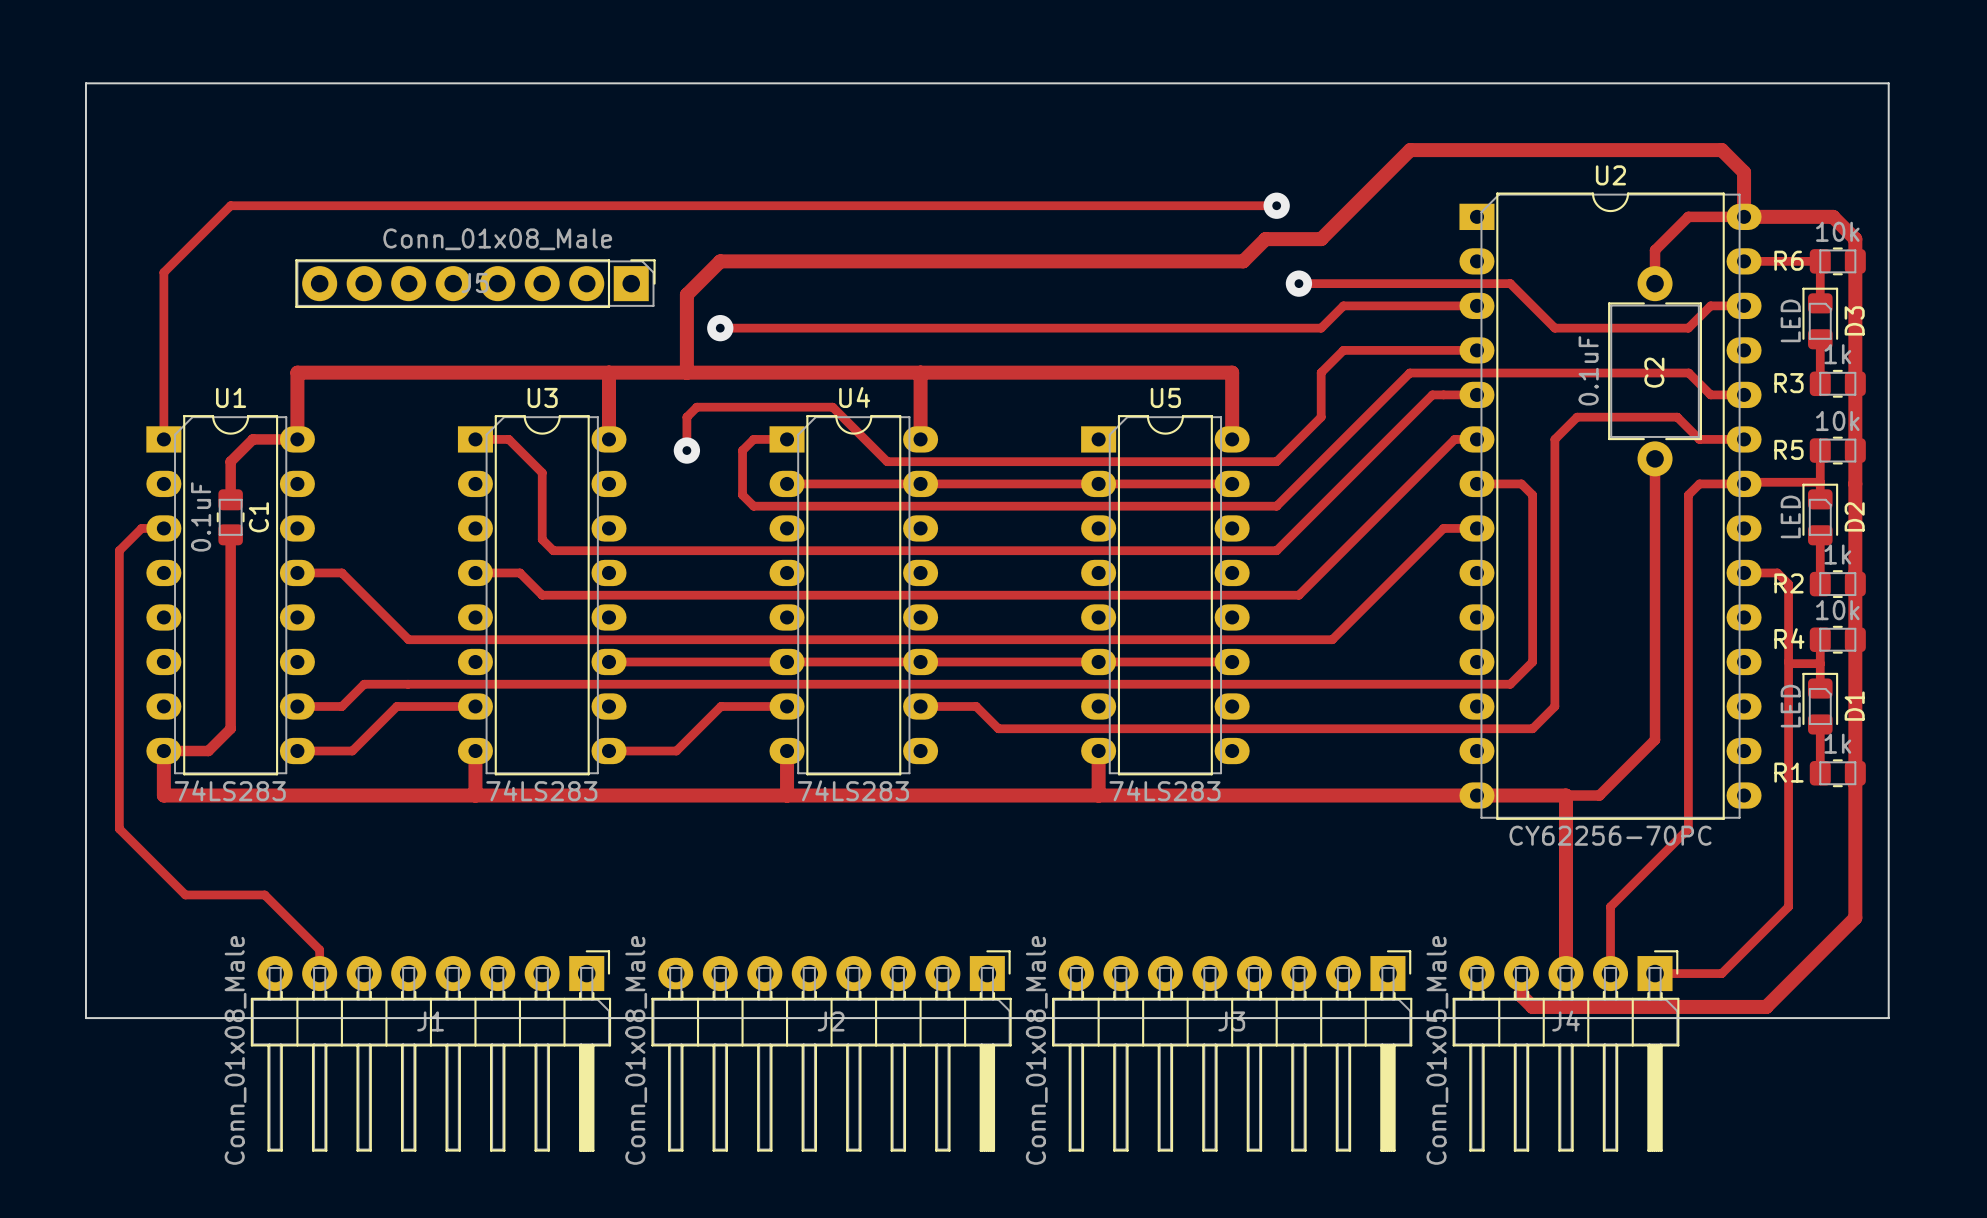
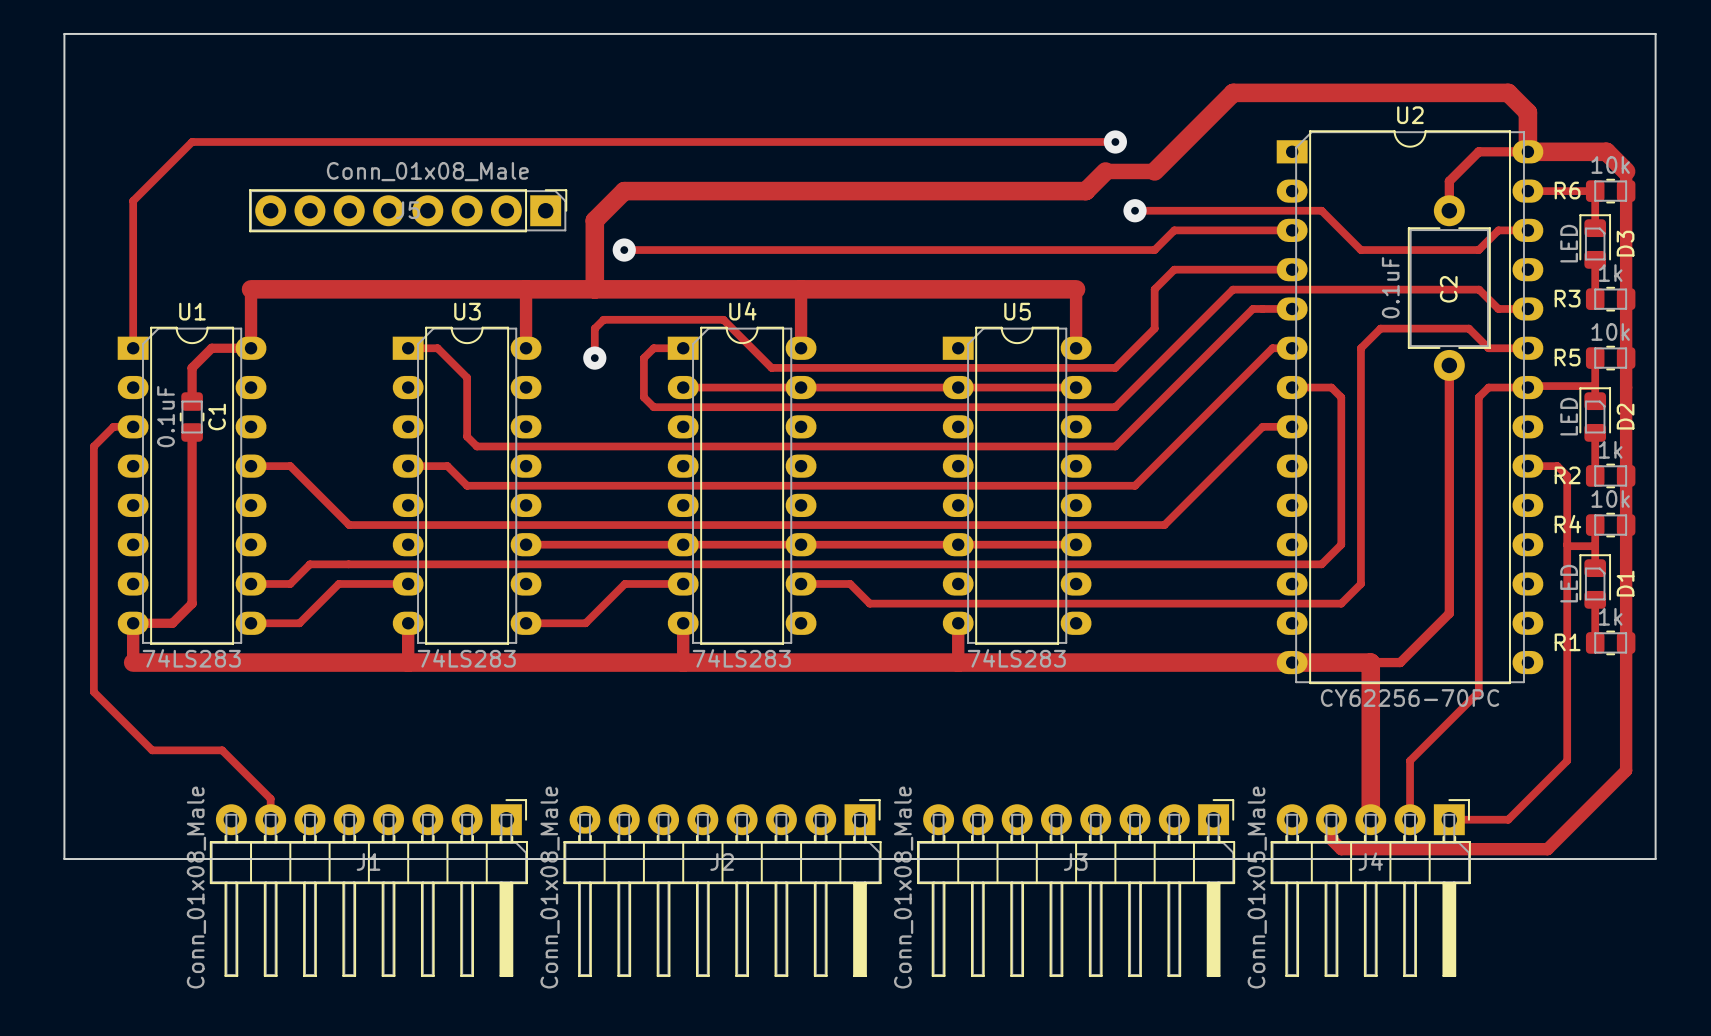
track width: thin (1855, 239) (1833, 216) (1744, 216) (1744, 172) (1721, 150) (1410, 150) (1321, 239) (1265, 239) (1243, 261) (720, 261) (686, 294) (686, 372) -> thick (1626, 171) (1606, 151) (1527, 151) (1527, 112) (1508, 92) (1233, 92) (1154, 171) (1105, 171) (1085, 191) (624, 191) (594, 220) (594, 289)
track width: thin (297, 372) (1232, 372) -> thick (251, 289) (1076, 289)
track width: thin (163, 795) (1566, 795) (1566, 973) -> thick (133, 662) (1370, 662) (1370, 819)

